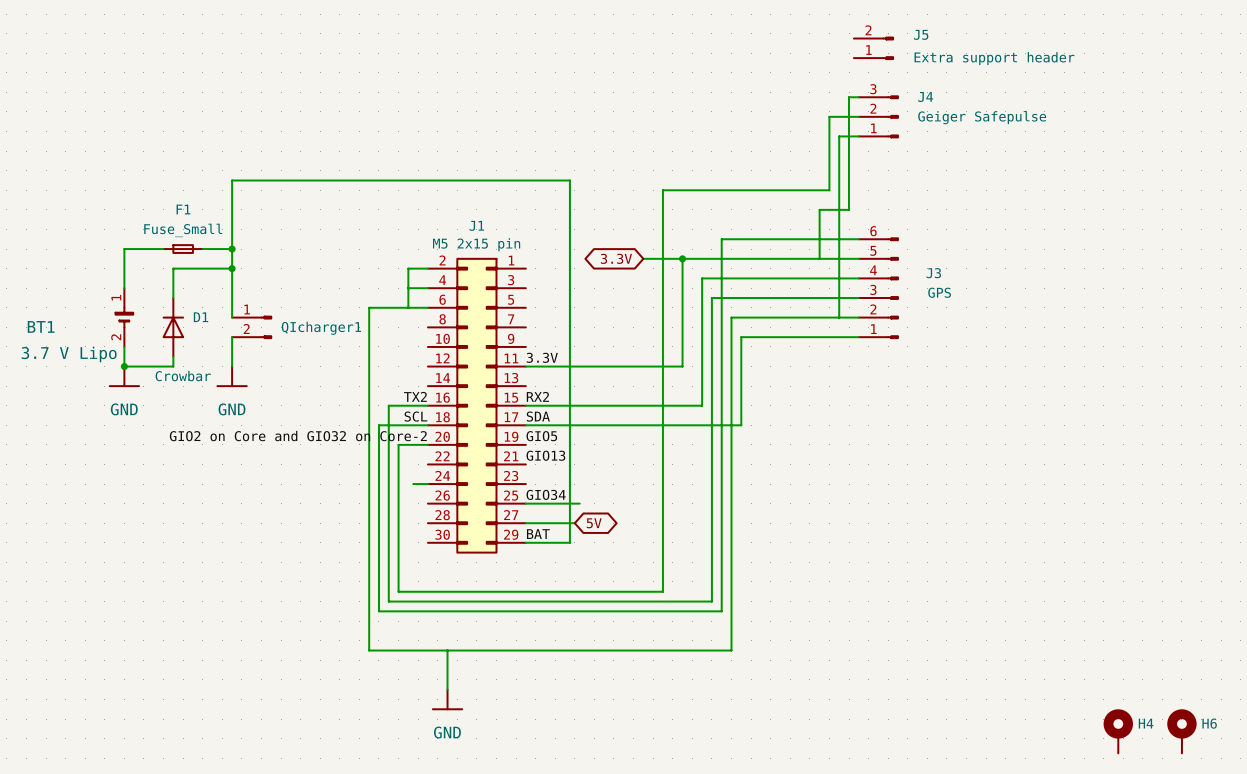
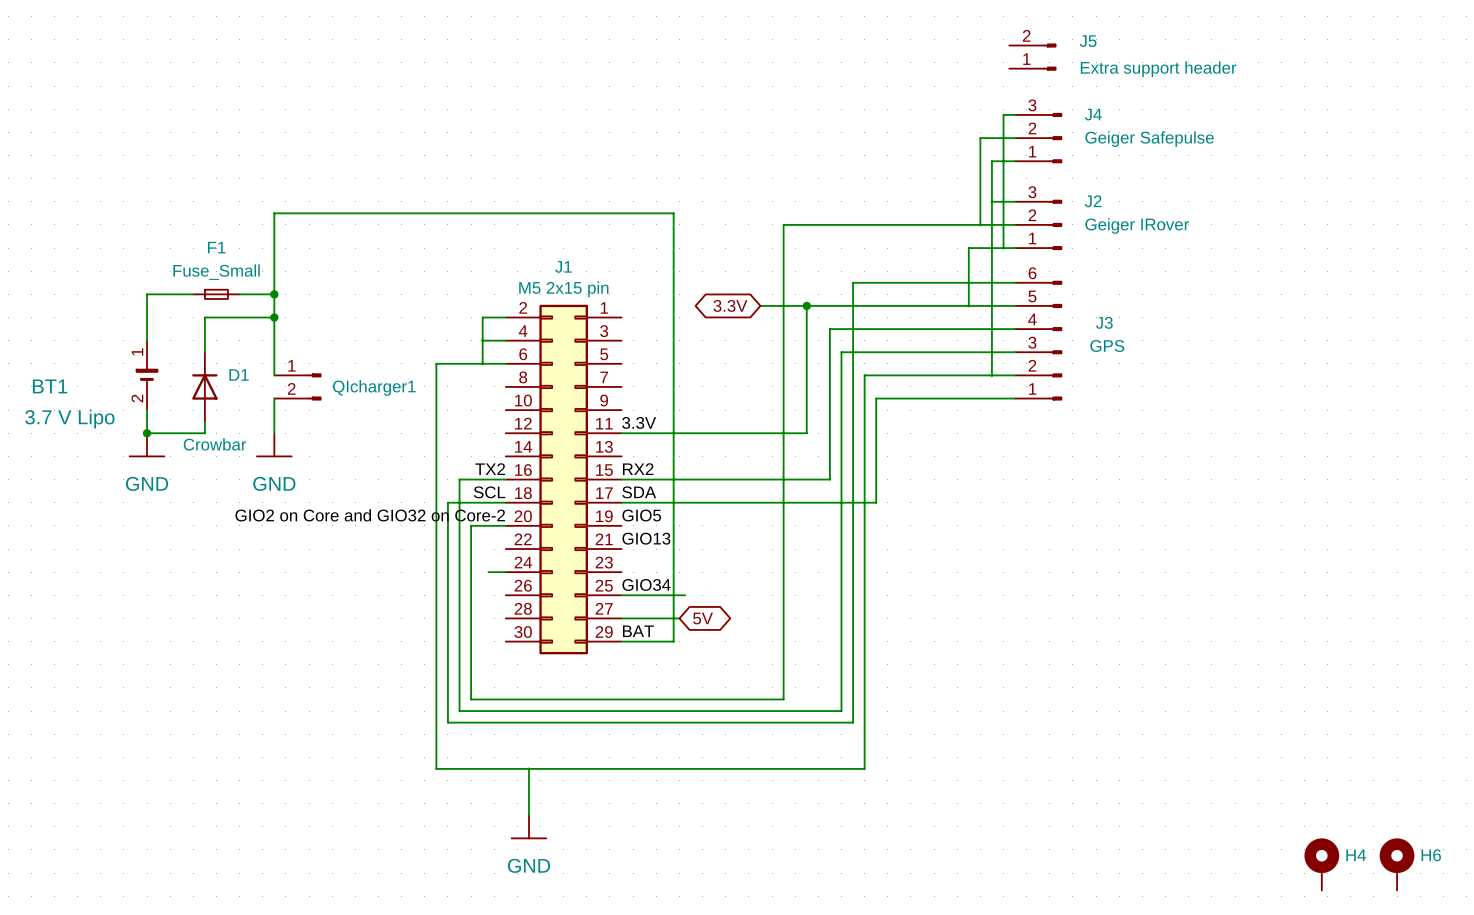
wire: none -> (991, 201) (1015, 201)
wire: none -> (980, 224) (1015, 224)
J2: none -> Geiger IRover (1038, 224)
wire: none -> (1003, 248) (1015, 248)

